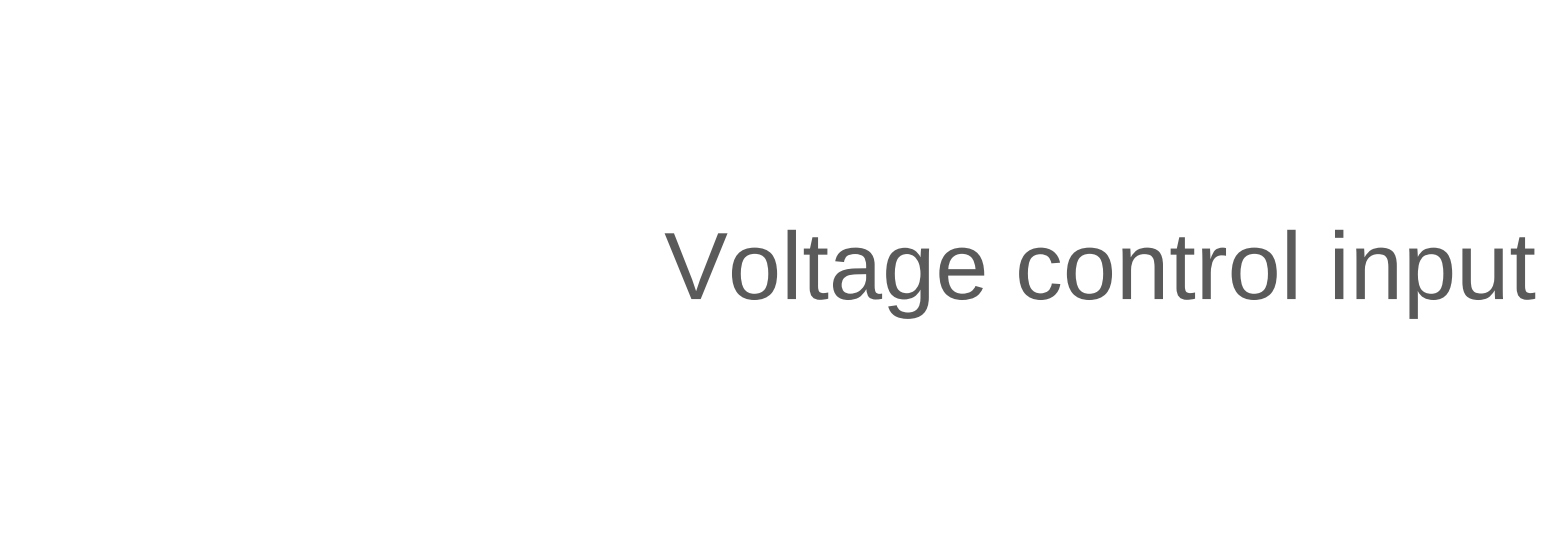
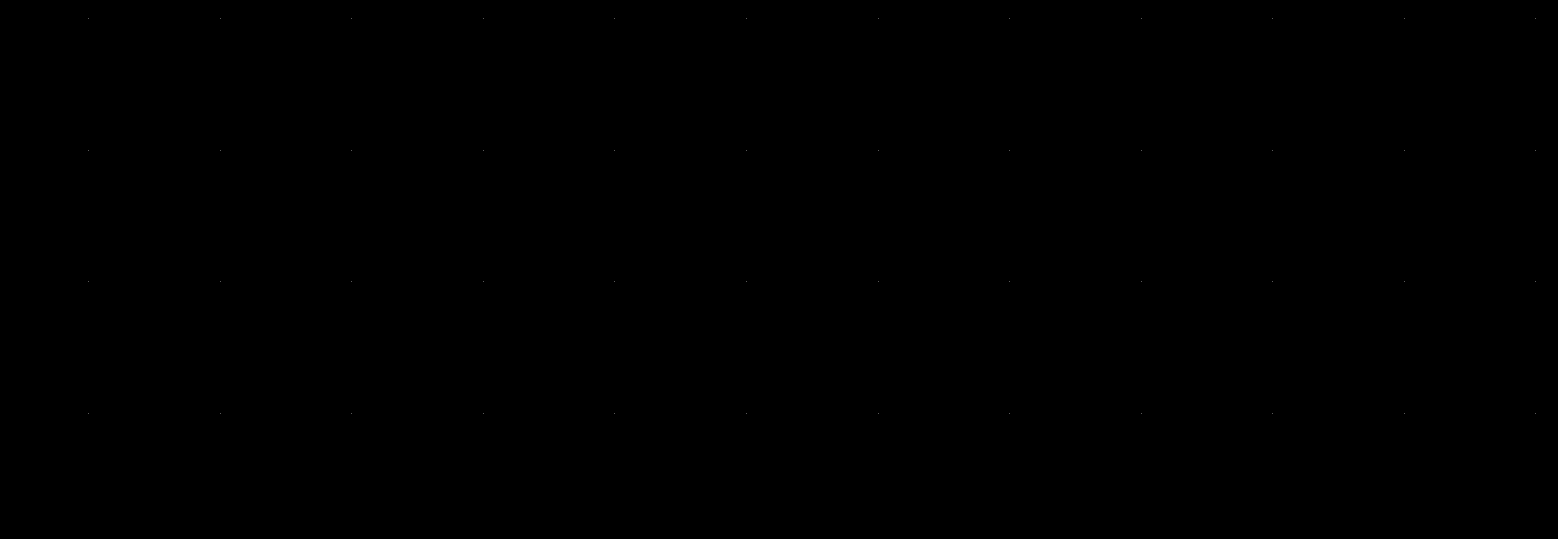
text: Voltage control input (1099, 274) -> none

